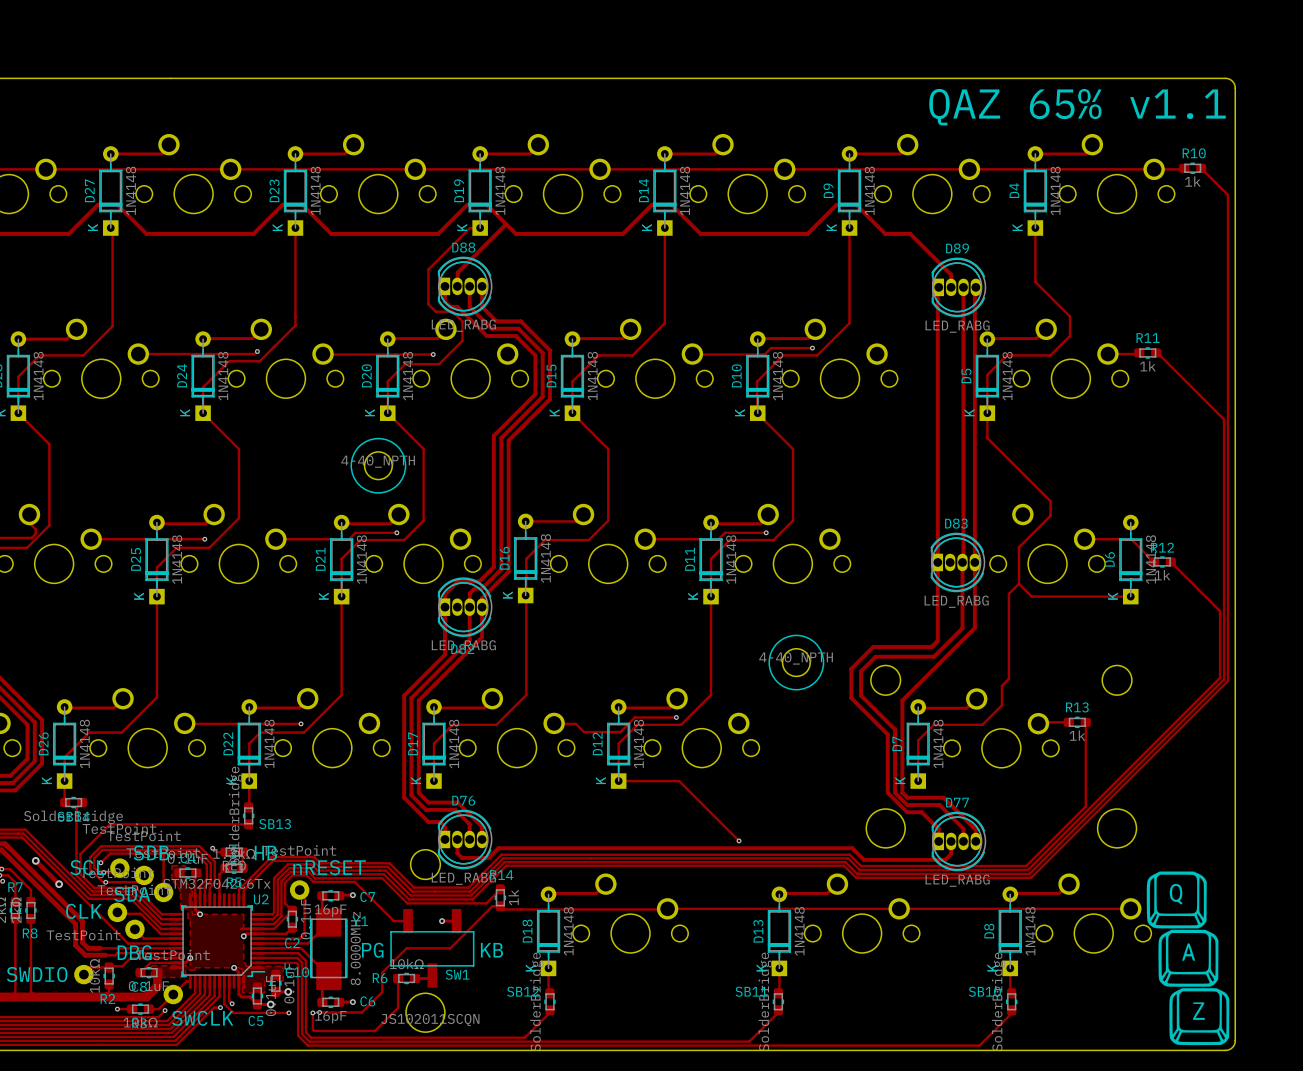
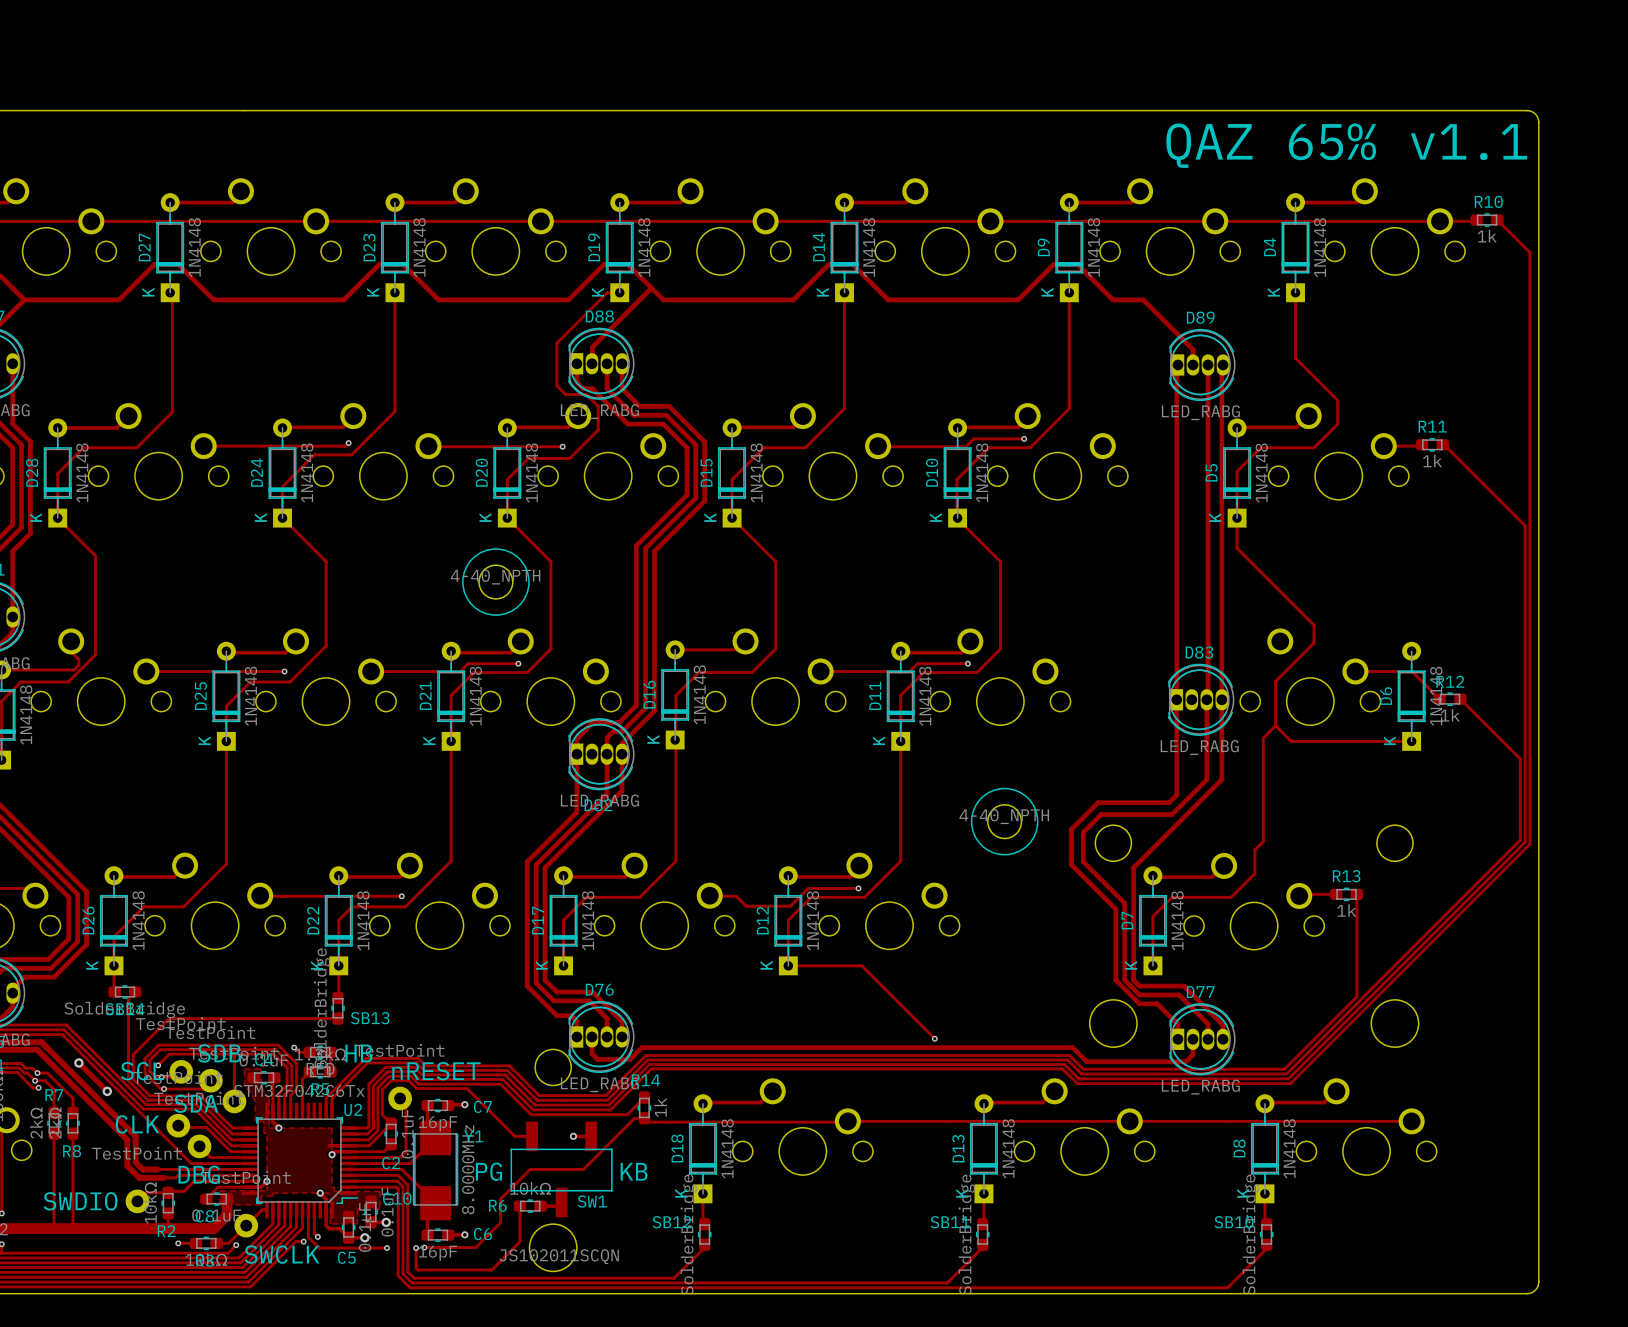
drawing: [1146, 871, 1230, 1046] -> none

